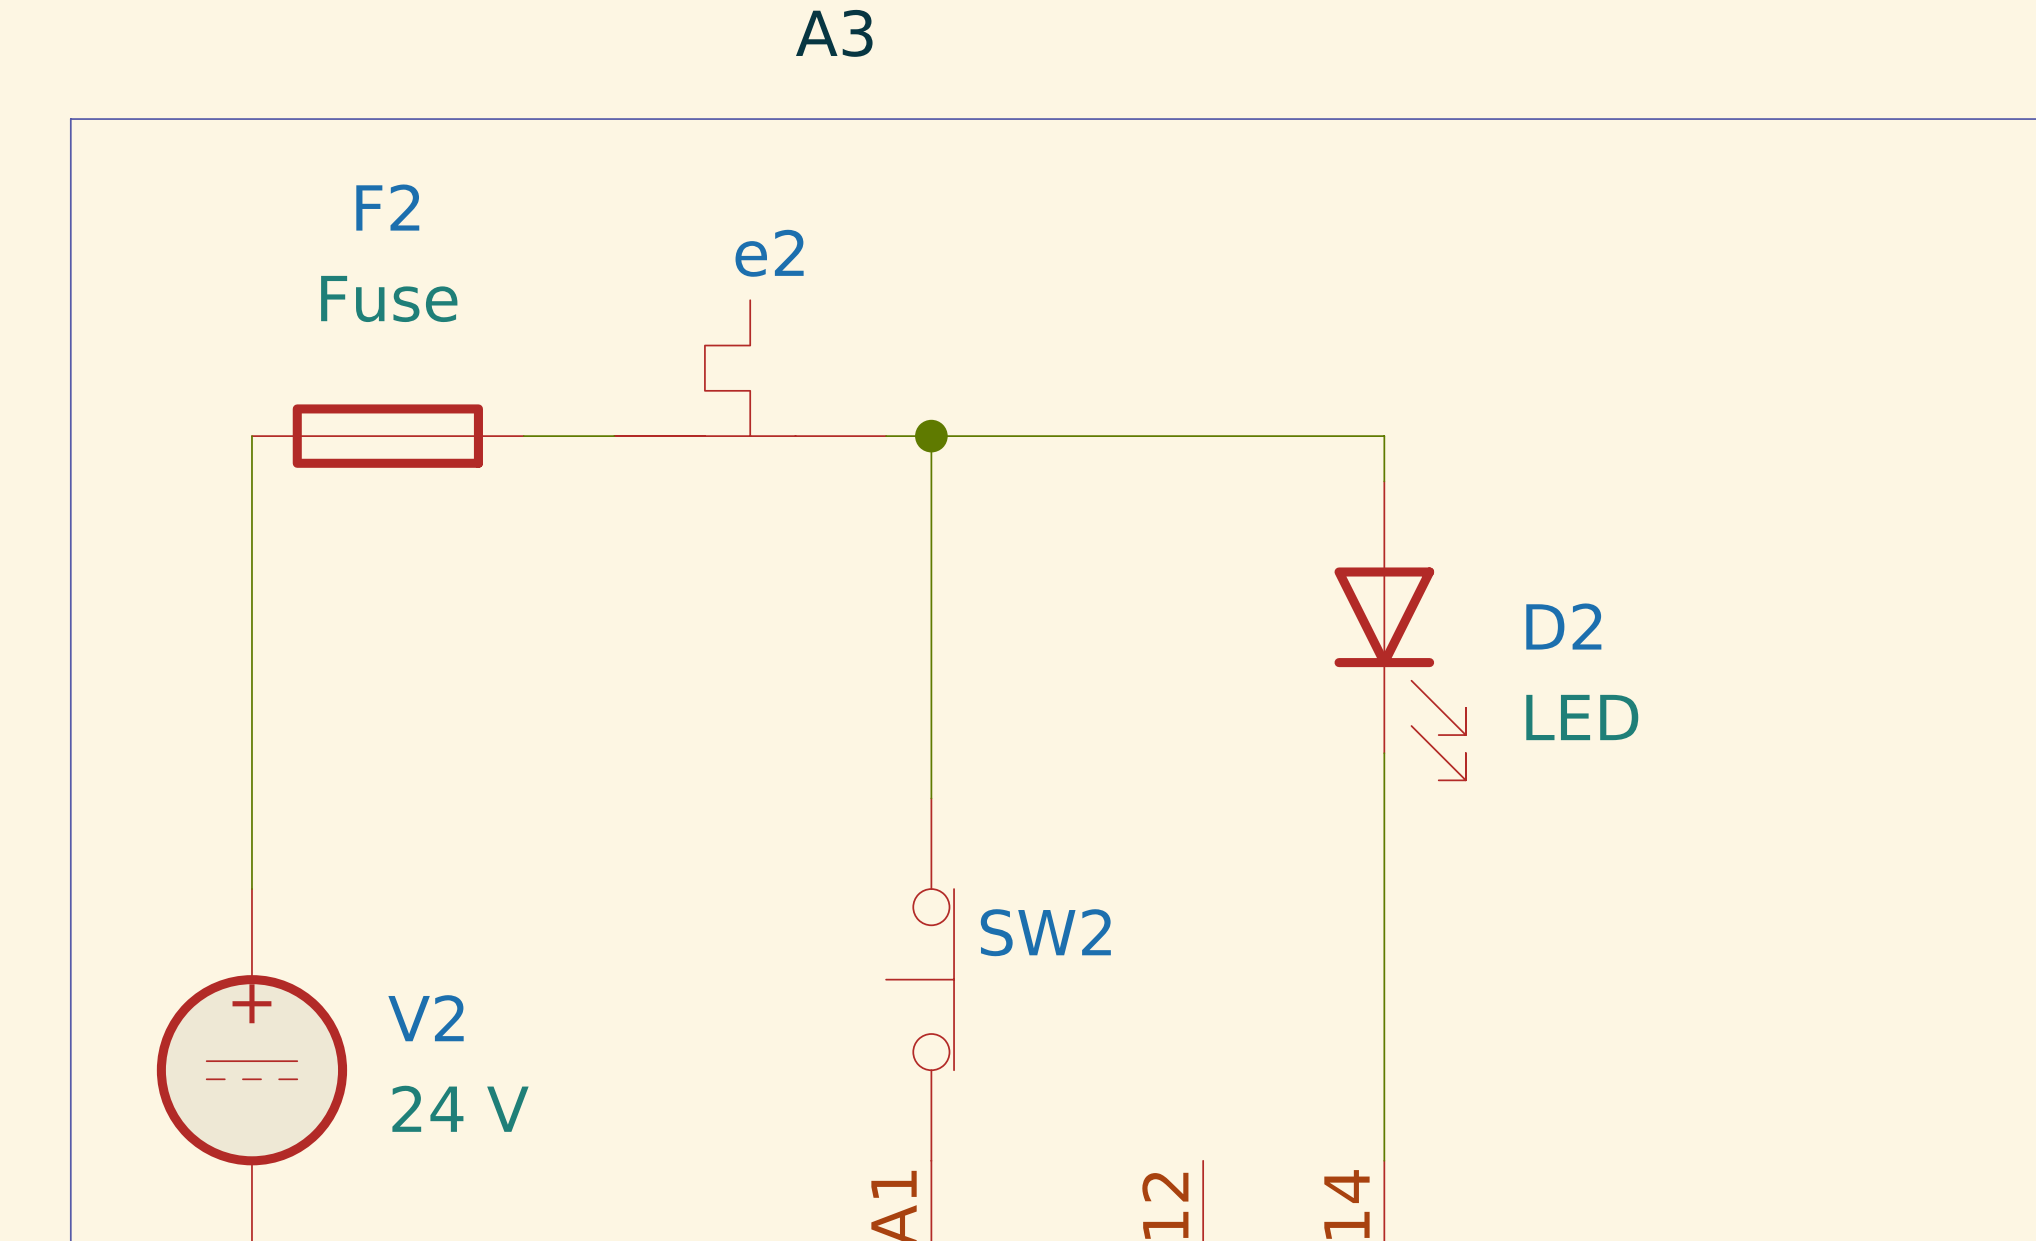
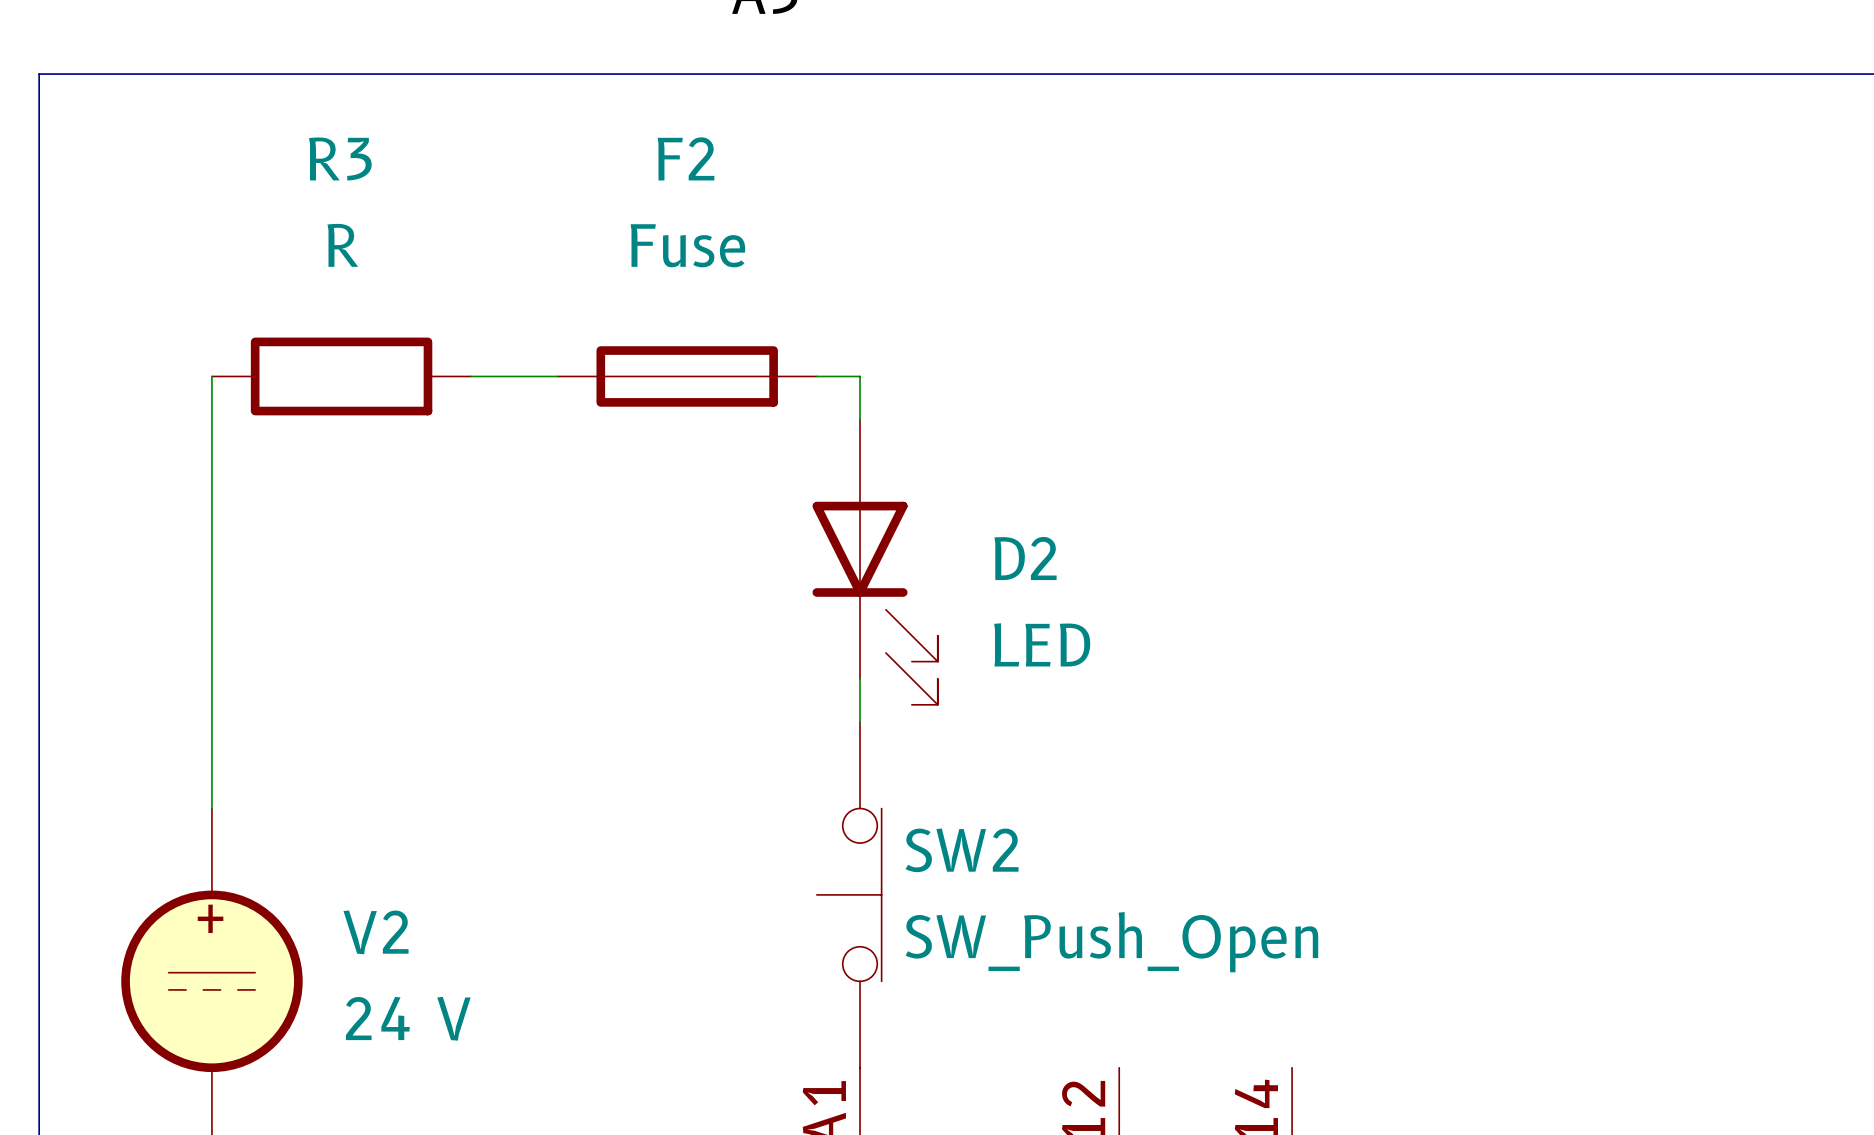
e2: (750, 368) -> none
F2 position: (387, 436) -> (687, 376)
R3: none -> R (341, 376)
wire: (931, 436) (1384, 436) (1384, 481) -> none
junction: (931, 436) -> none
D2 position: (1400, 630) -> (875, 562)
wire: (1384, 753) (1384, 1160) -> none
SW2 value: none -> SW_Push_Open (1111, 942)

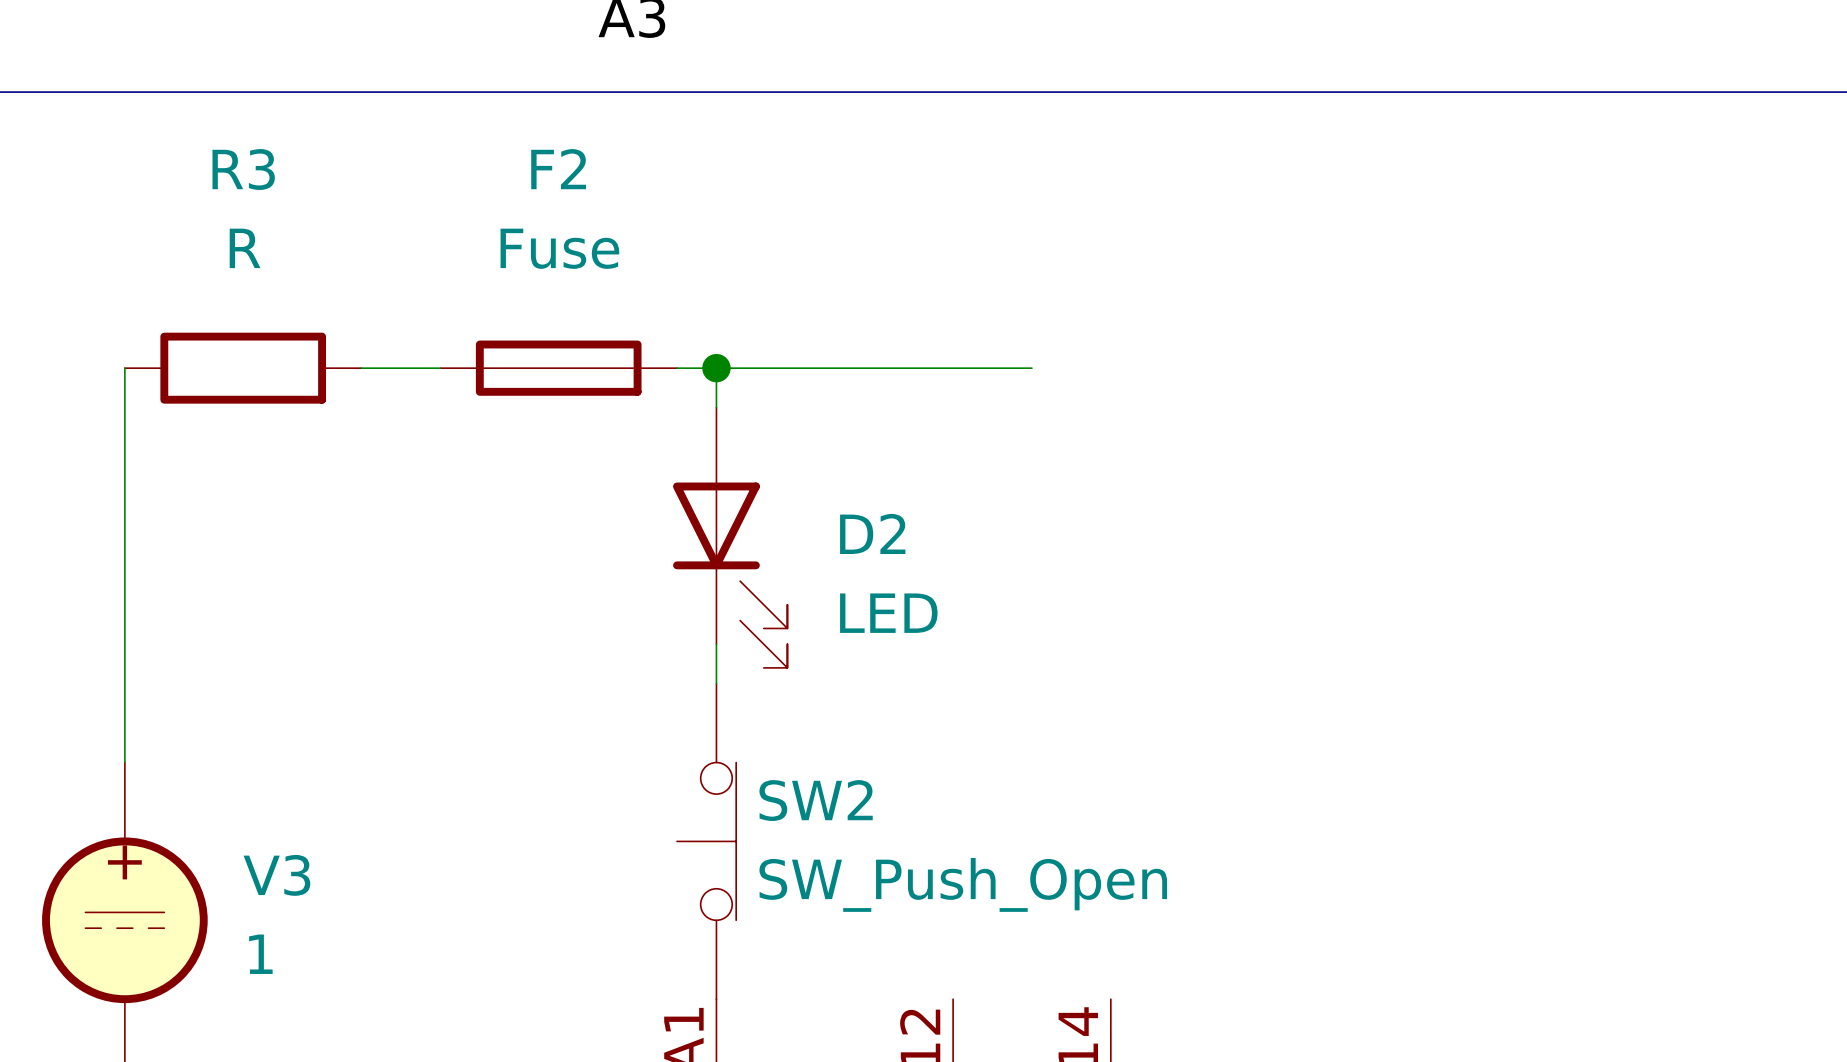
wire: none -> (716, 368) (1031, 368)
junction: none -> (716, 368)
V2 name: V2 (376, 932) -> V3 (276, 875)
V2 value: 24 V (408, 1018) -> 1 (260, 954)

